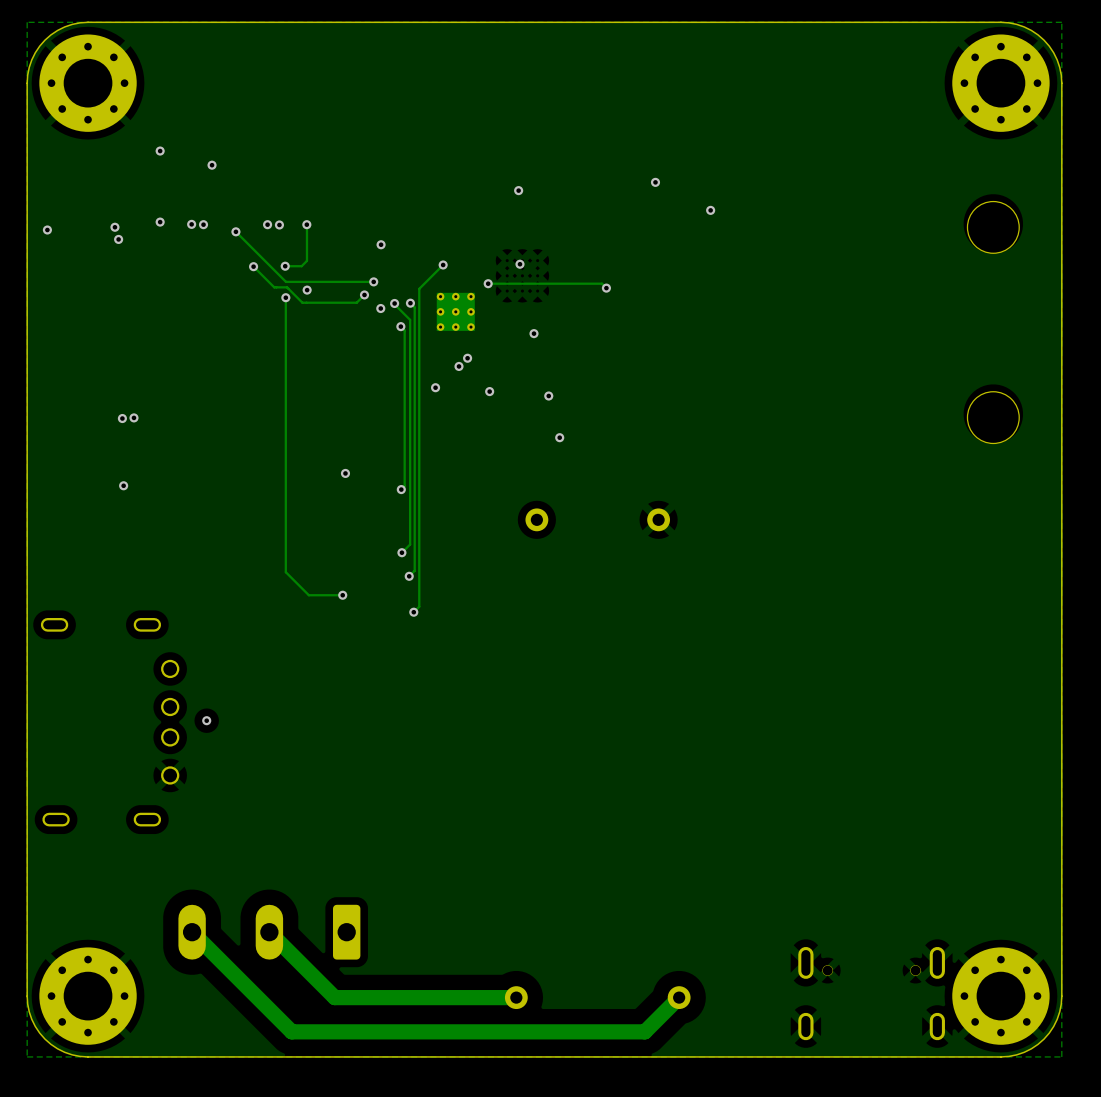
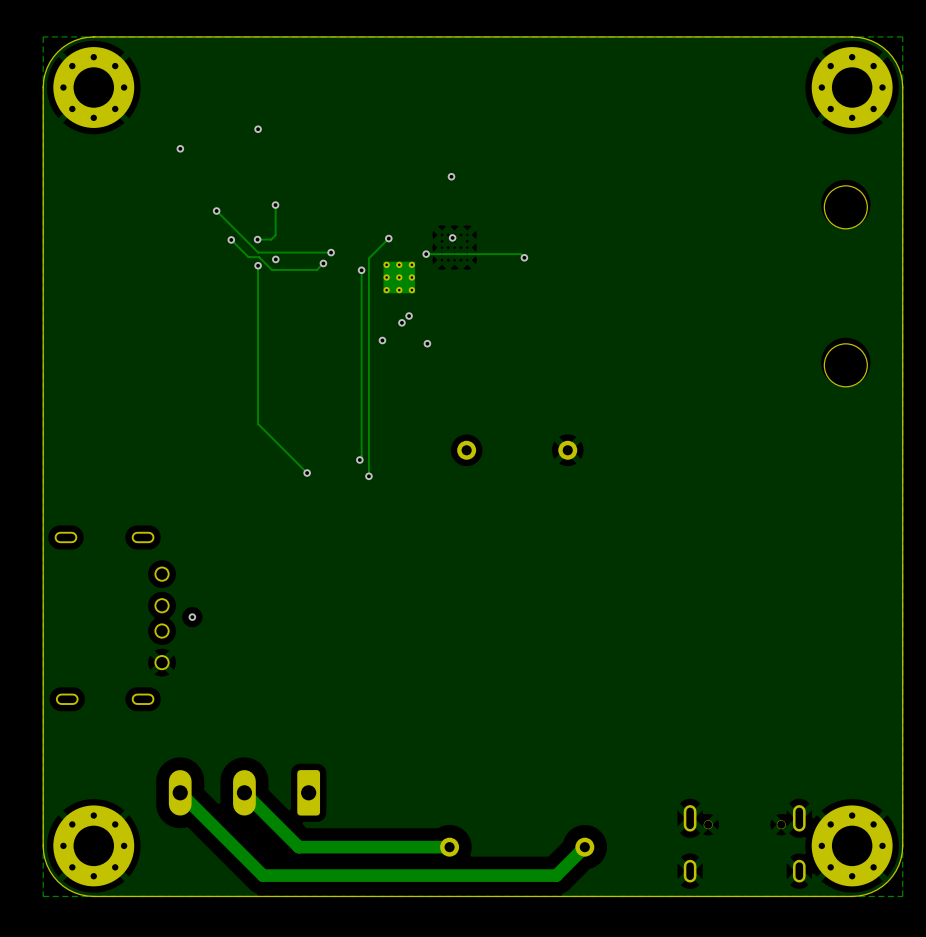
via: none -> (258, 129)
via: (160, 151) -> none
via: none -> (180, 148)
via: (212, 165) -> none
via: (655, 182) -> none
via: (710, 210) -> none
via: (160, 222) -> none
via: (191, 224) -> none
via: (203, 224) -> none
via: (267, 224) -> none
via: (279, 224) -> none
via: (114, 227) -> none
via: (47, 230) -> none
via: (118, 239) -> none
via: (381, 244) -> none
track: (394, 303) (410, 319) (410, 544) (401, 552) -> none
via: (394, 303) -> none
track: (410, 303) (414, 307) (414, 570) (409, 576) -> (361, 270) (361, 458) (359, 460)
via: (380, 308) -> none
track: (400, 326) (404, 330) (404, 486) (401, 489) -> none
via: (400, 326) -> none
via: (533, 333) -> none
via: (548, 396) -> none
via: (133, 417) -> none
via: (122, 418) -> none
via: (559, 437) -> none
via: (345, 473) -> none
via: (123, 485) -> none
track: (285, 488) (285, 572) (308, 595) (342, 595) -> (258, 423) (307, 473)
via: (401, 489) -> none
via: none -> (359, 460)
via: none -> (307, 473)
track: (419, 551) (419, 606) (413, 612) -> none
via: none -> (368, 476)
via: (401, 552) -> none
via: (409, 576) -> none
via: (342, 595) -> none
via: (413, 612) -> none

